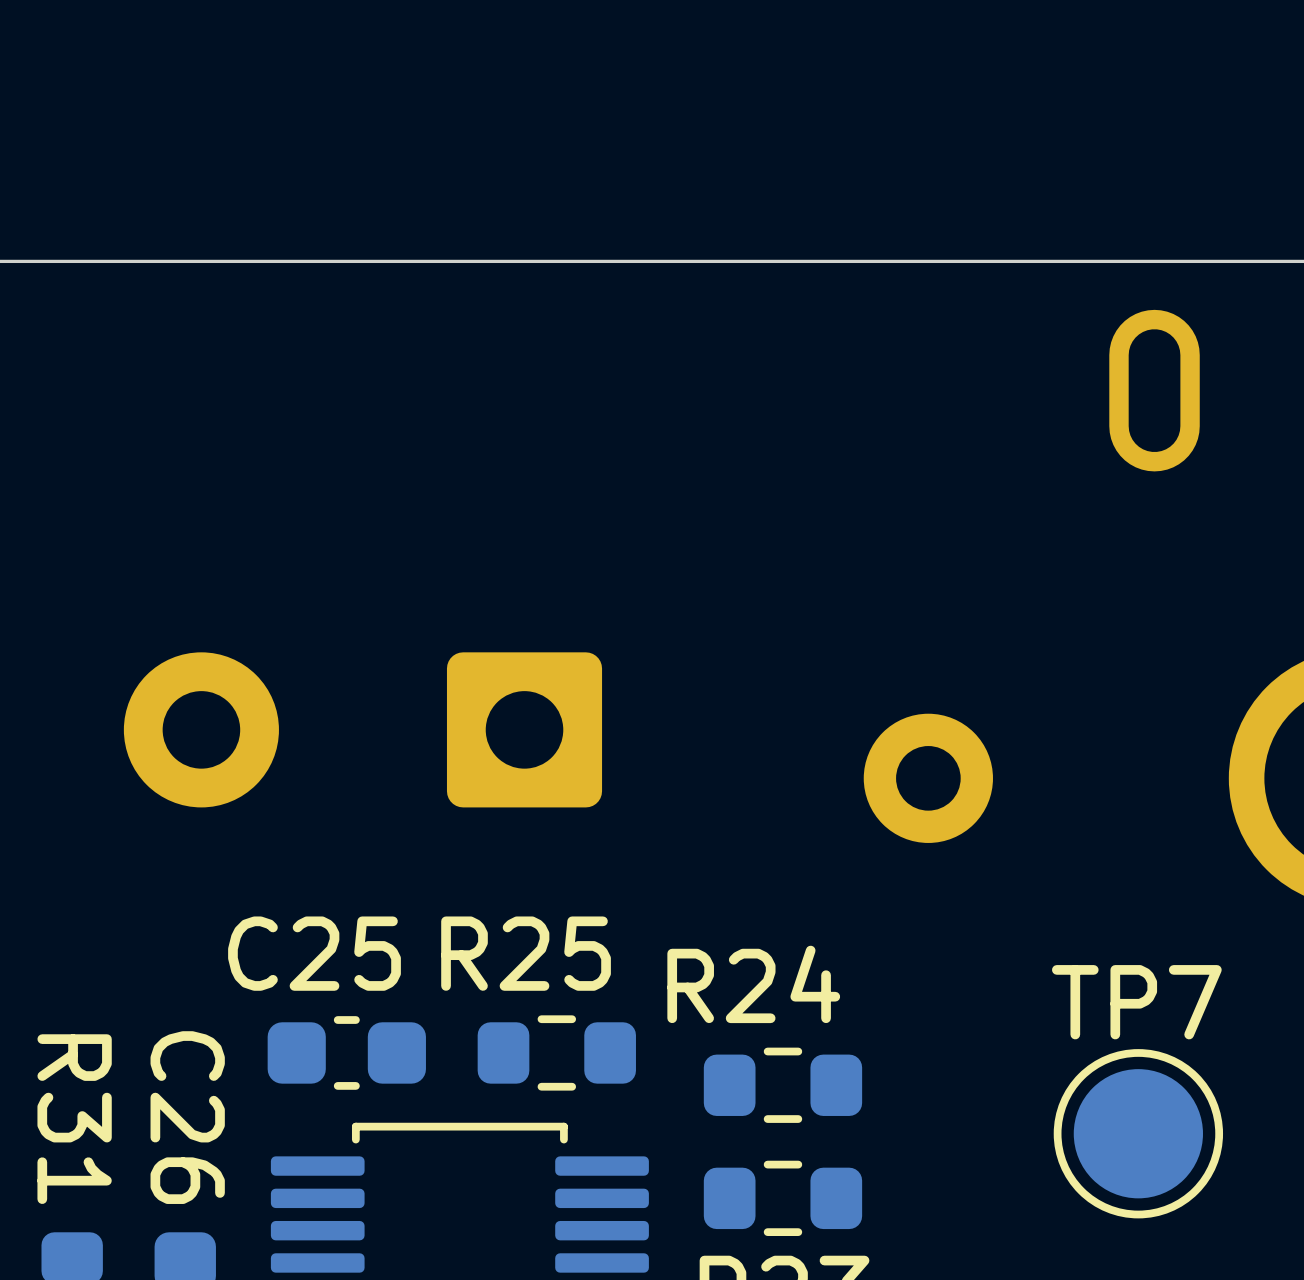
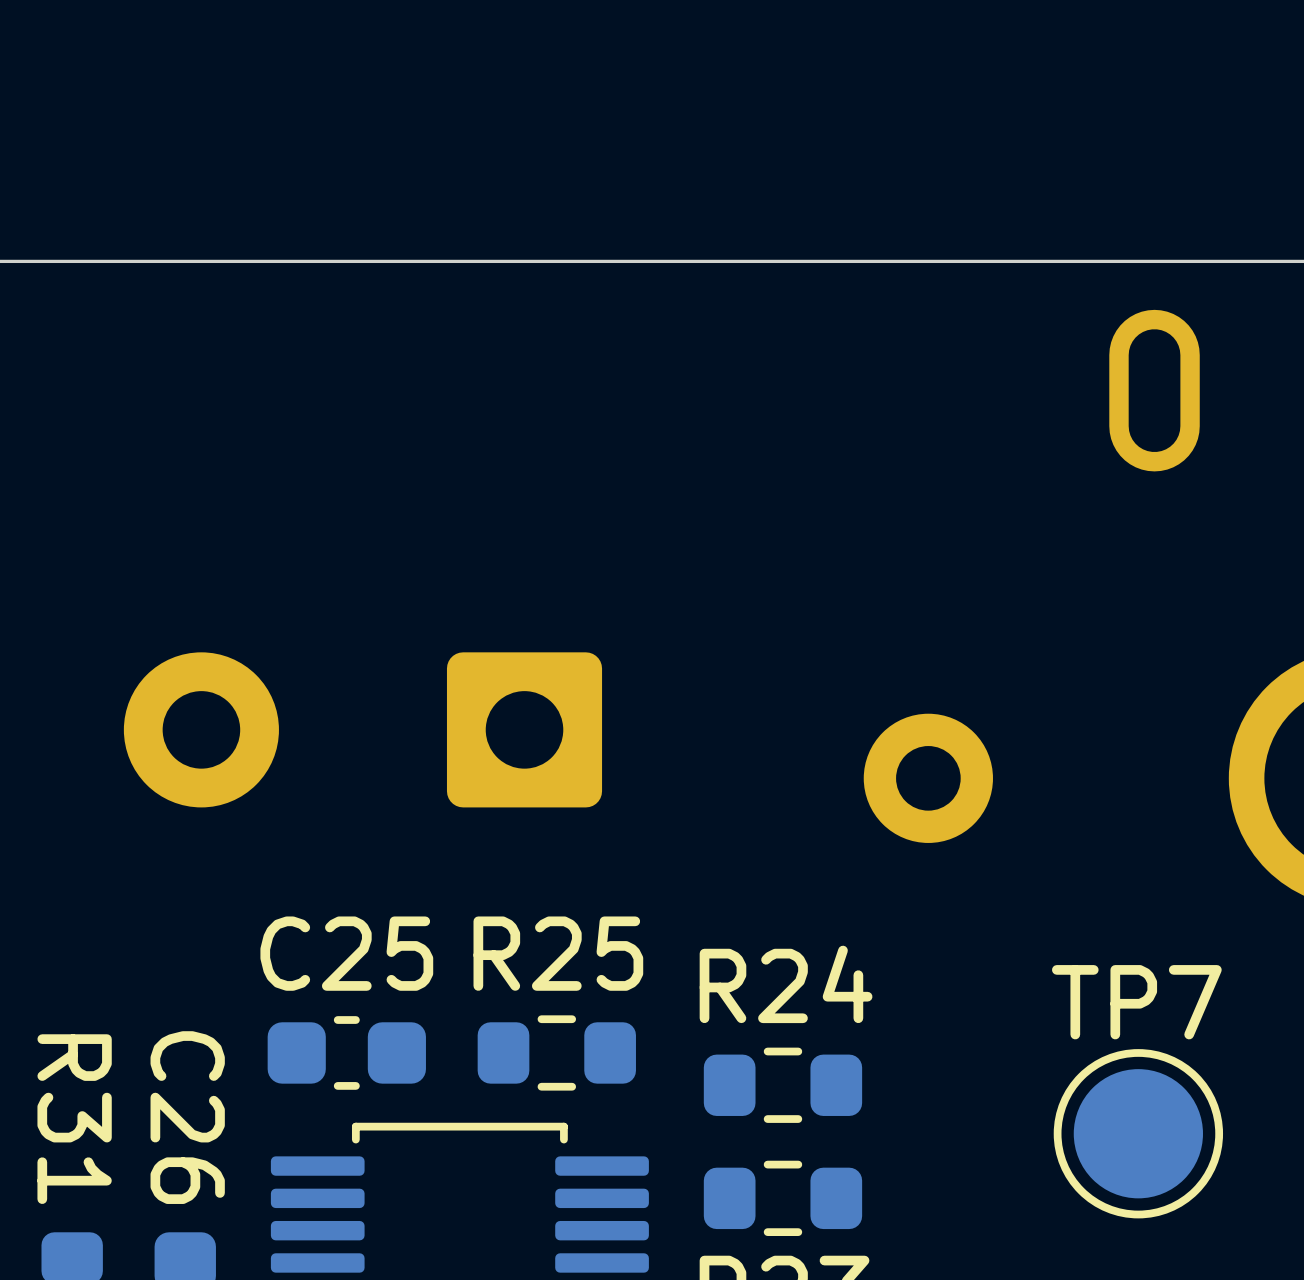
C25 name position: C25 (314, 953) -> C25 (346, 953)
R25 name position: R25 (526, 953) -> R25 (558, 953)
R24 name position: R24 (753, 984) -> R24 (786, 984)

